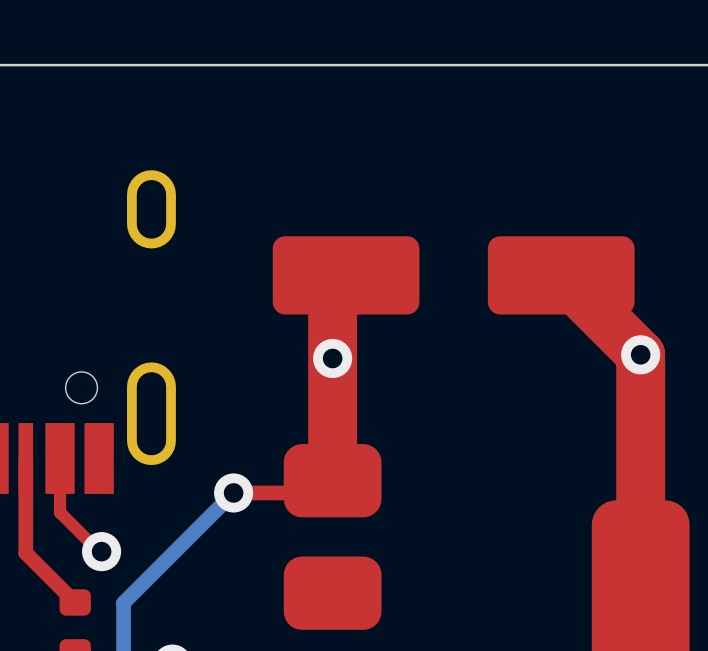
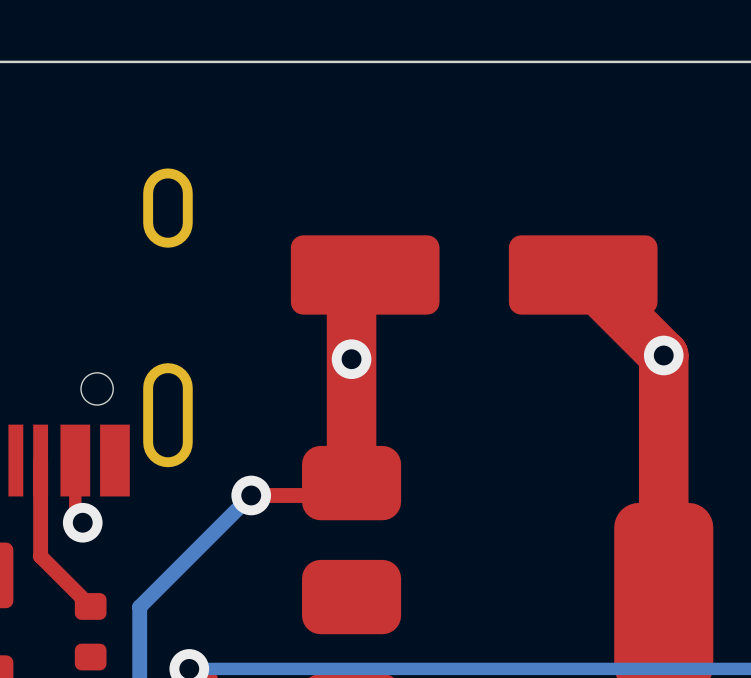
top track: (67, 519) (99, 551) (101, 551) -> none
via position: (101, 551) -> (82, 522)

